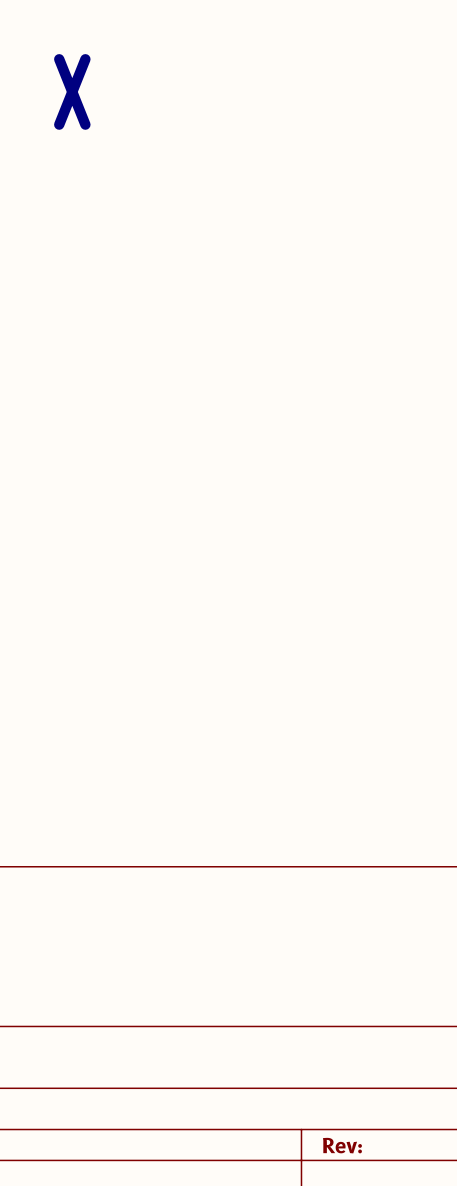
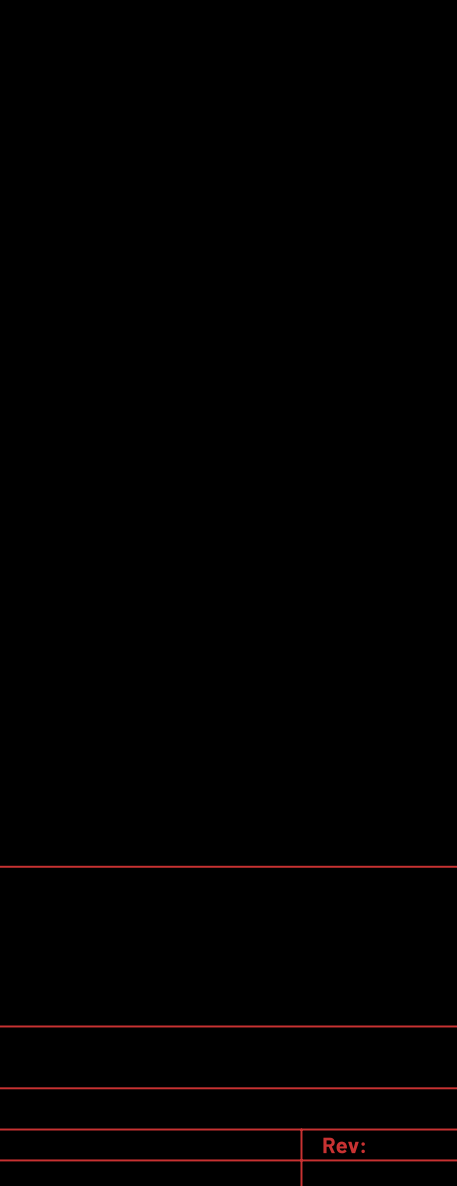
line: (59, 59) (85, 124) -> none
line: (85, 59) (59, 124) -> none

